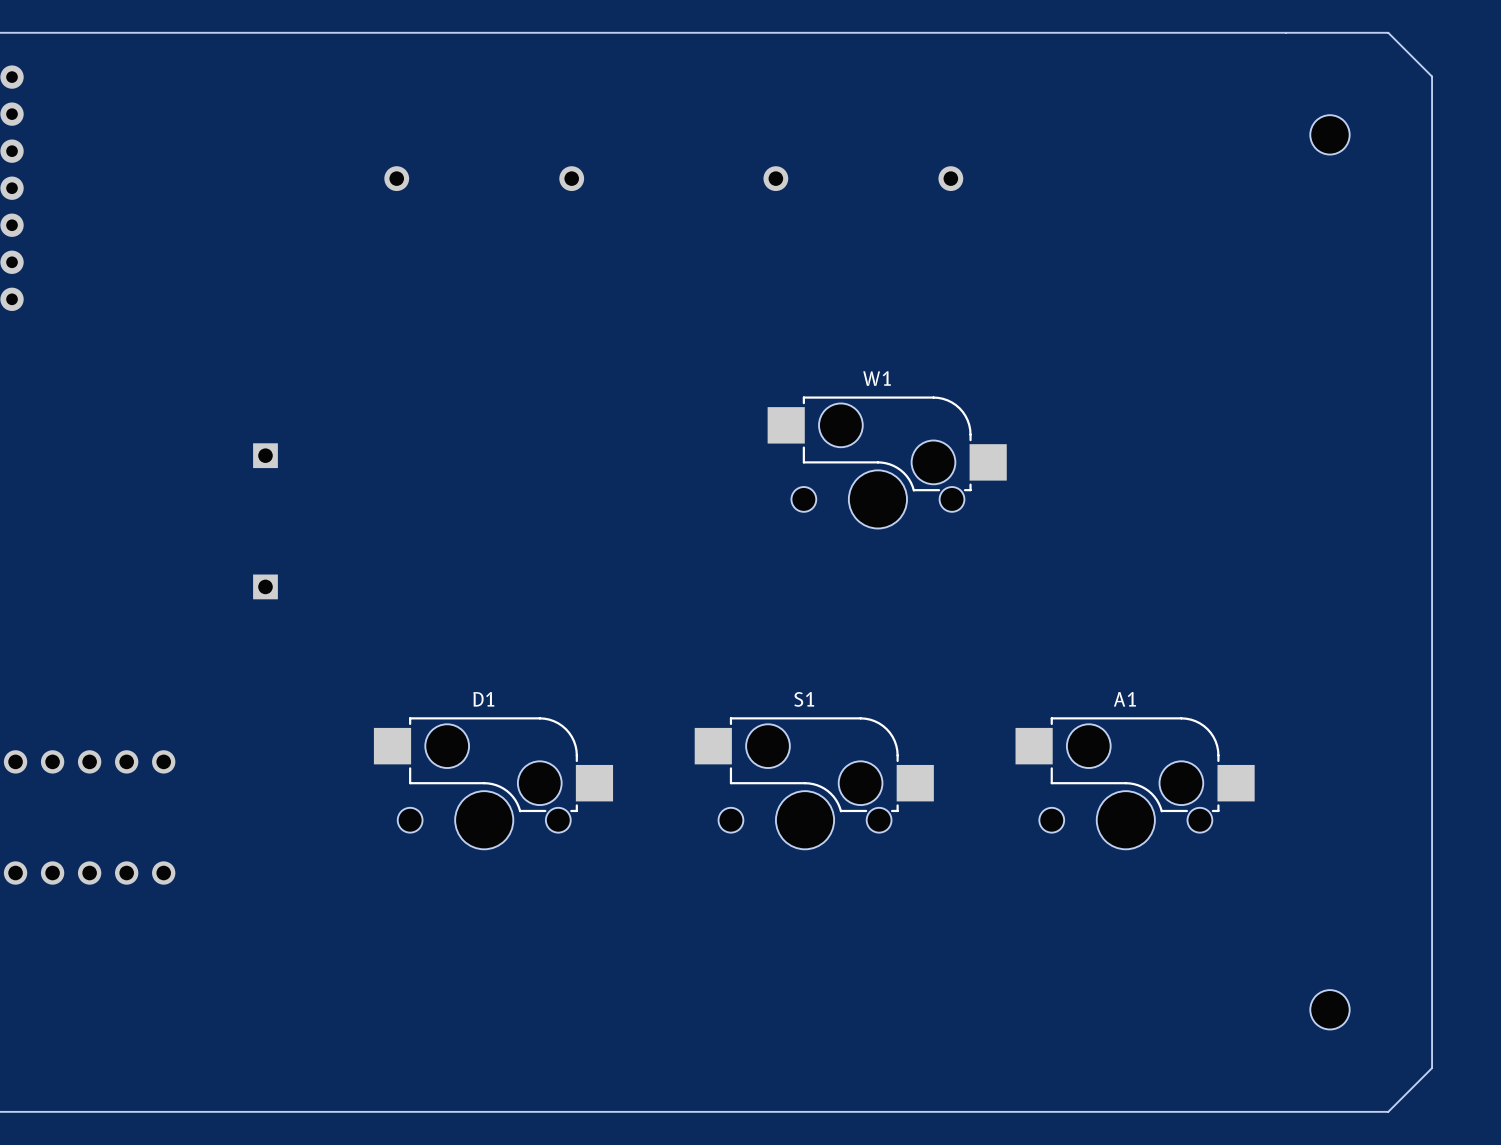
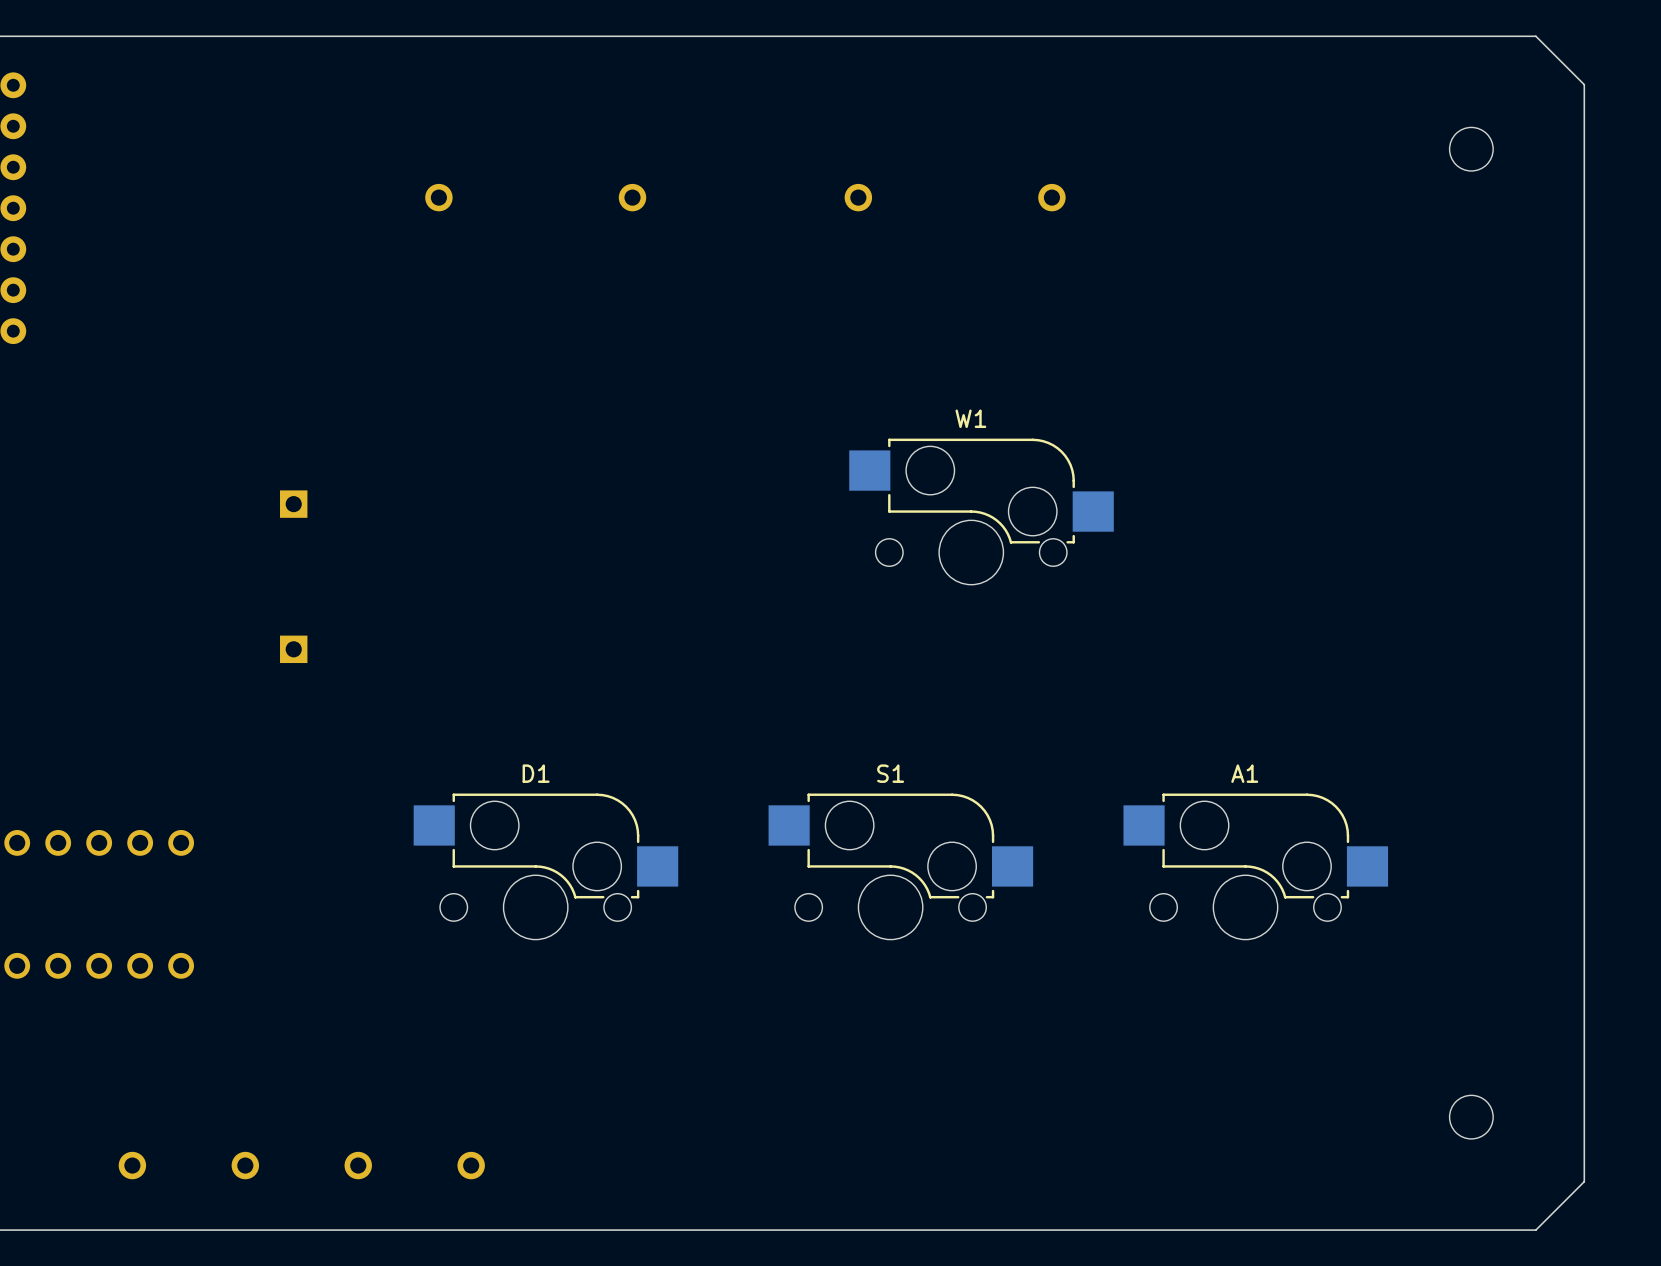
part: none -> (132, 1165)
part: none -> (245, 1165)
part: none -> (358, 1165)
part: none -> (471, 1165)

